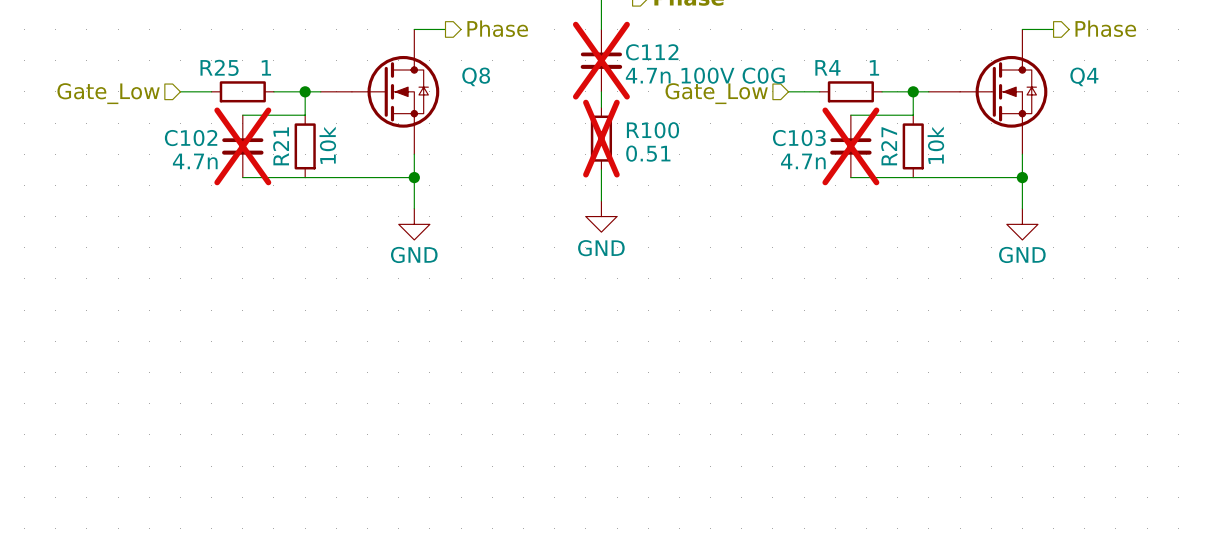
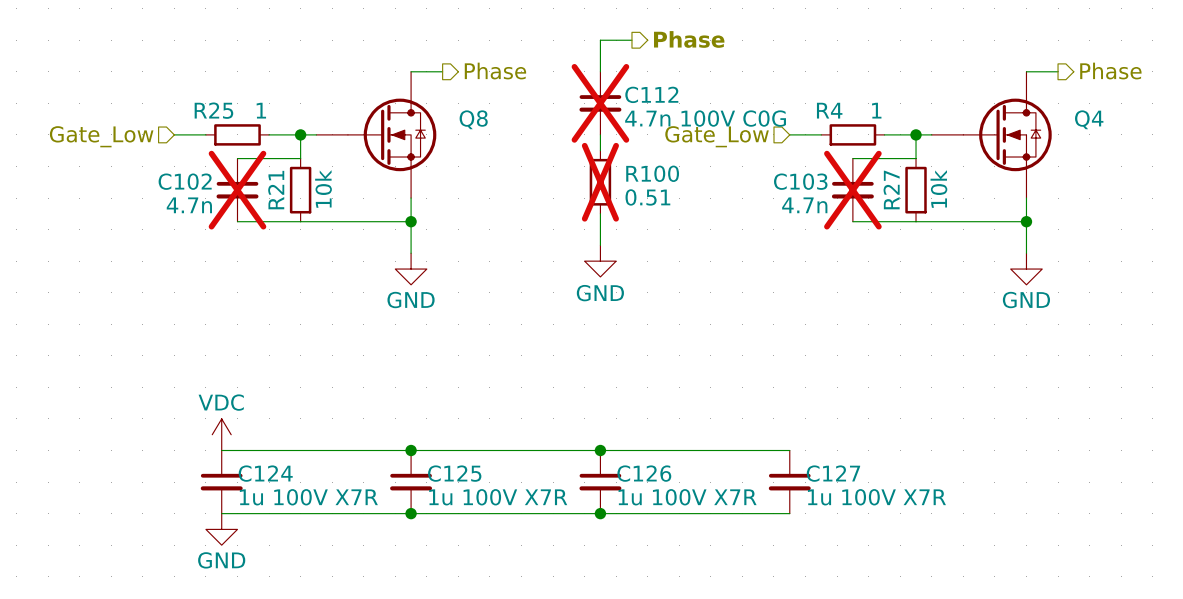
power symbol: none -> VDC (221, 434)
wire: none -> (221, 450) (789, 450)
junction: none -> (411, 450)
junction: none -> (600, 450)
C124: none -> 1u 100V X7R (221, 482)
C125: none -> 1u 100V X7R (411, 482)
C126: none -> 1u 100V X7R (600, 482)
C127: none -> 1u 100V X7R (789, 482)
wire: none -> (221, 513) (789, 513)
junction: none -> (411, 513)
junction: none -> (600, 513)
power symbol: none -> GND (221, 529)

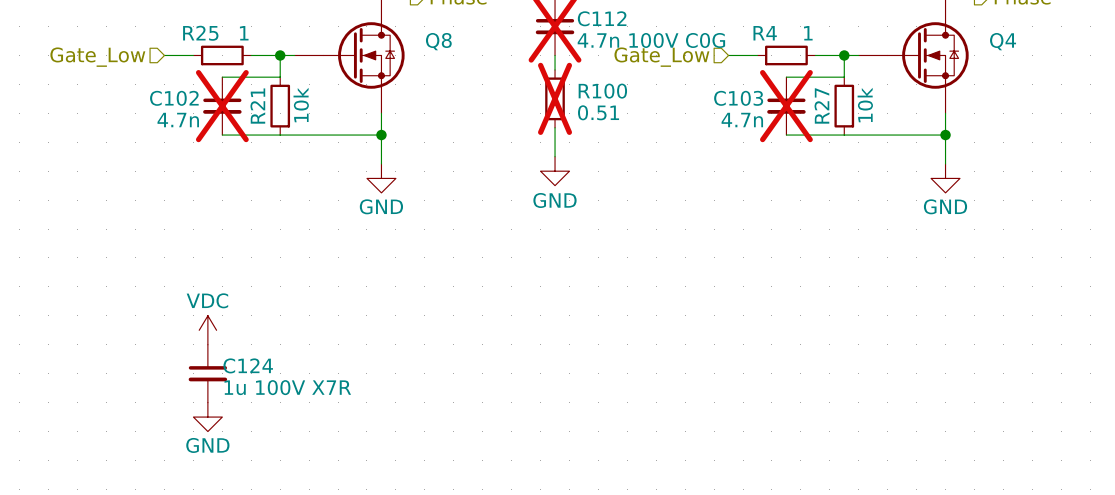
wire: (221, 450) (789, 450) -> none
junction: (411, 450) -> none
junction: (600, 450) -> none
C125: 1u 100V X7R (411, 482) -> none
C126: 1u 100V X7R (600, 482) -> none
C127: 1u 100V X7R (789, 482) -> none
wire: (221, 513) (789, 513) -> none
junction: (411, 513) -> none
junction: (600, 513) -> none

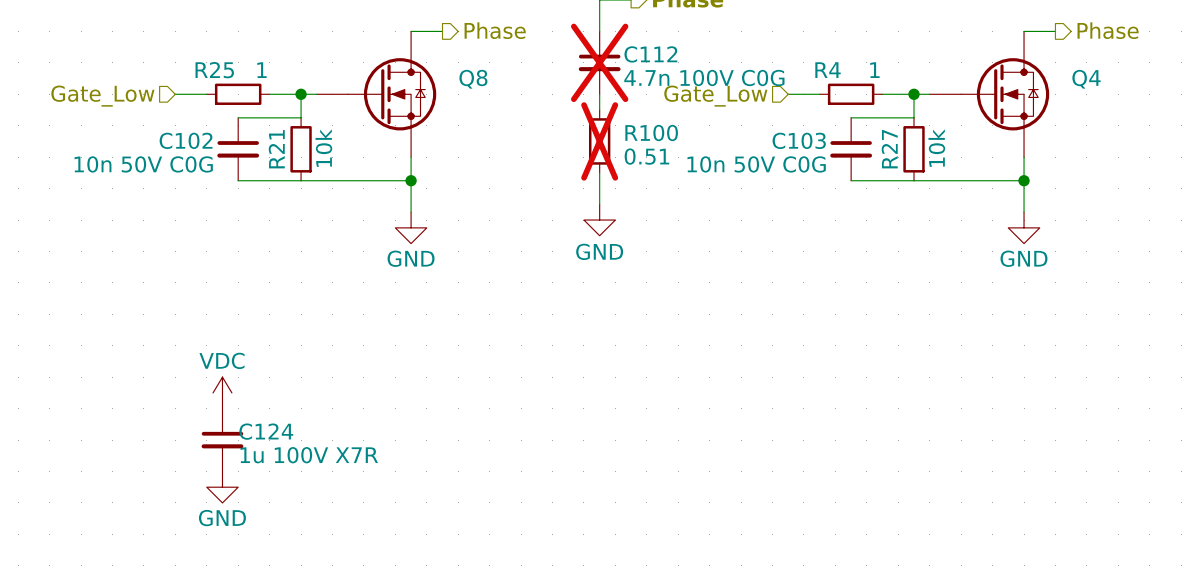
C102 do-not-place cross: (222, 106) -> none
C103 do-not-place cross: (786, 106) -> none
C102 value: 4.7n (178, 120) -> 10n 50V C0G (143, 164)
C103 value: 4.7n (742, 120) -> 10n 50V C0G (756, 164)

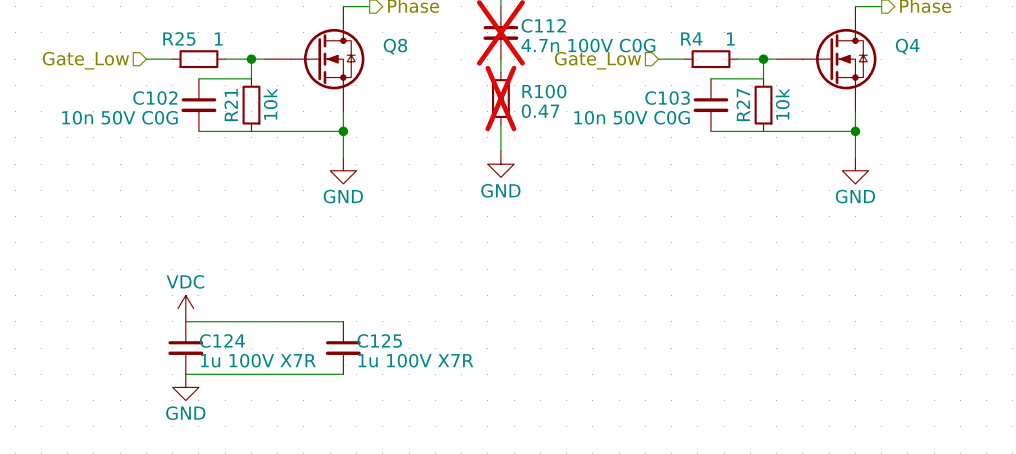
R100 value: 0.51 (646, 156) -> 0.47 (540, 111)
wire: none -> (185, 321) (343, 321)
C125: none -> 1u 100V X7R (343, 348)
wire: none -> (185, 374) (343, 374)

